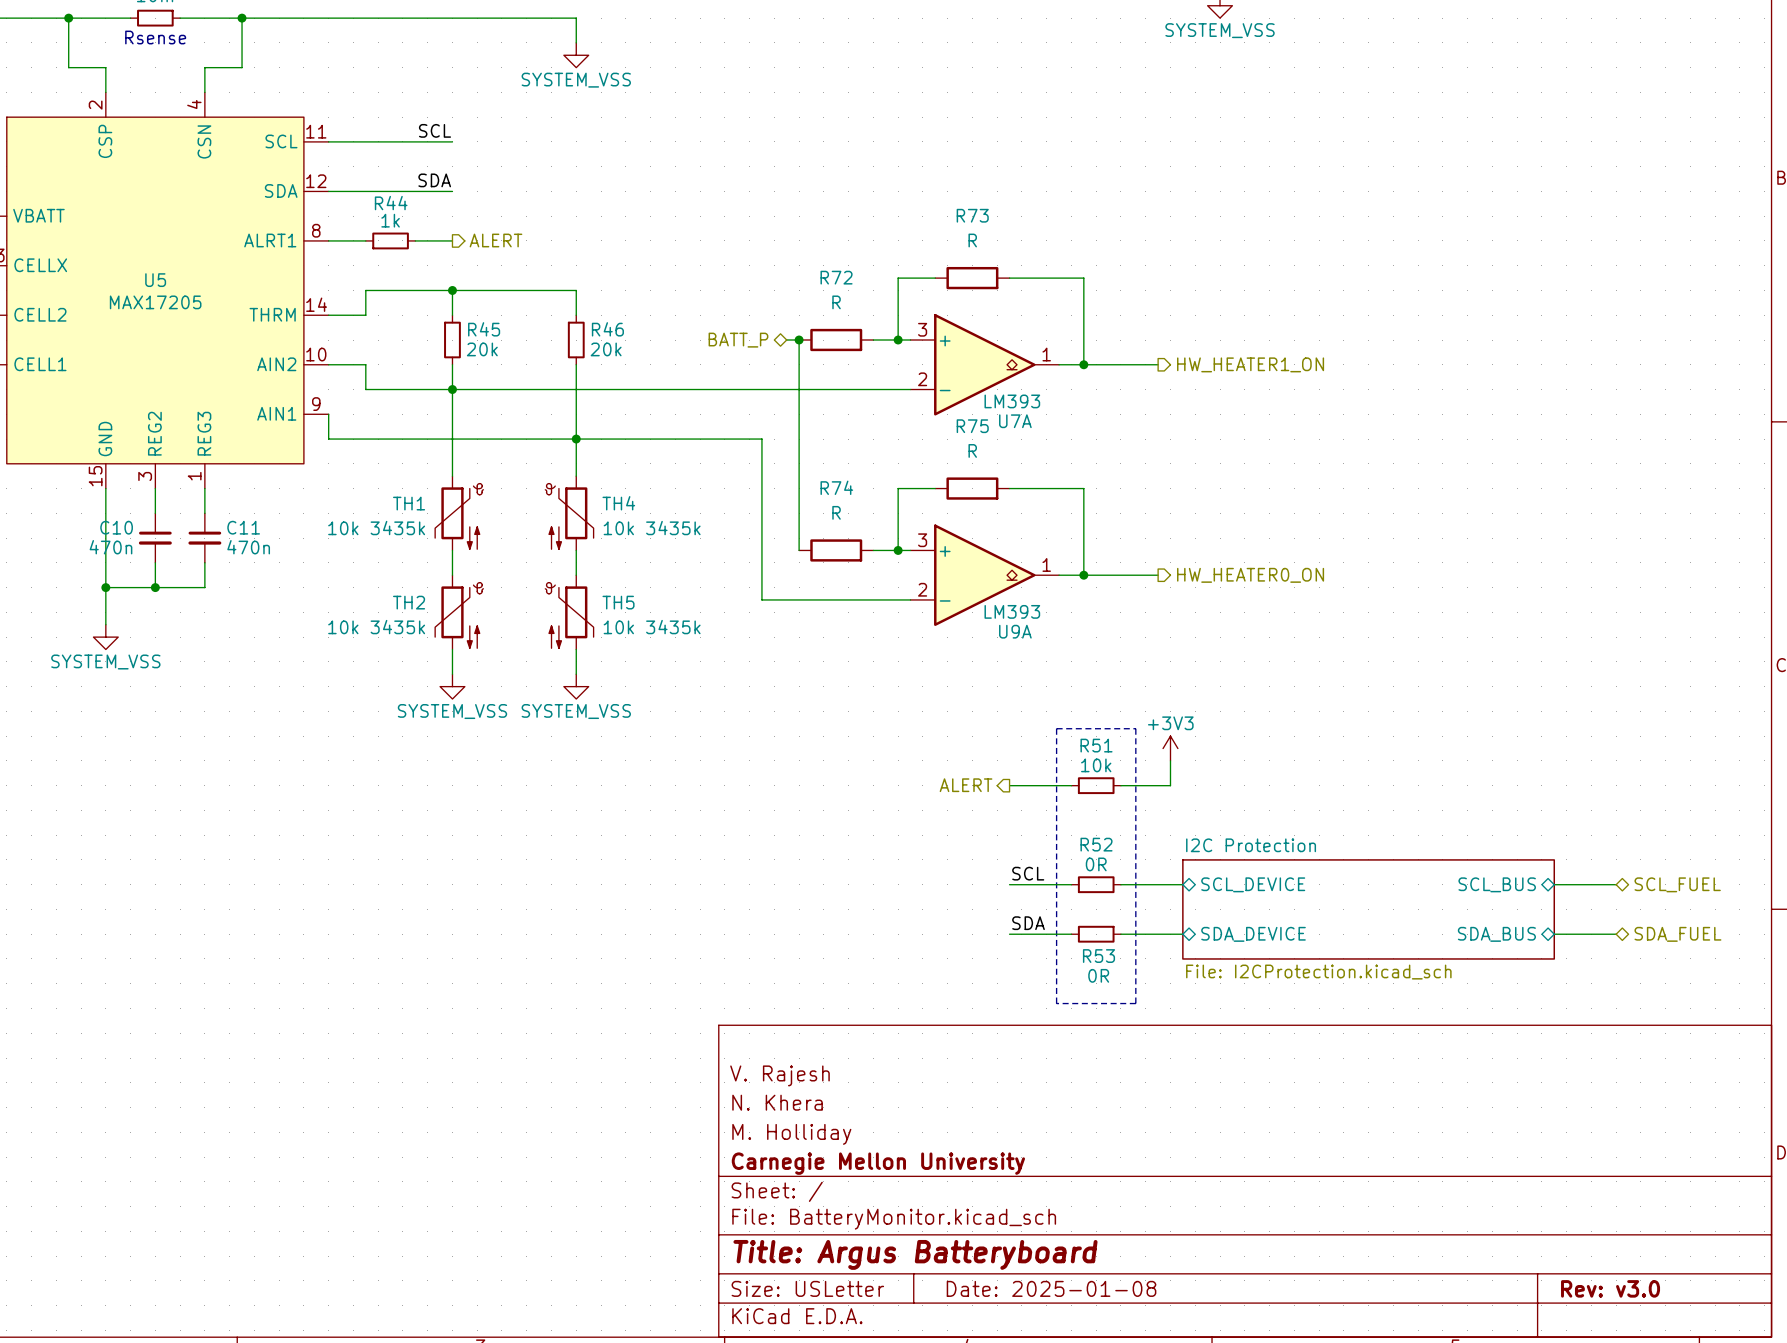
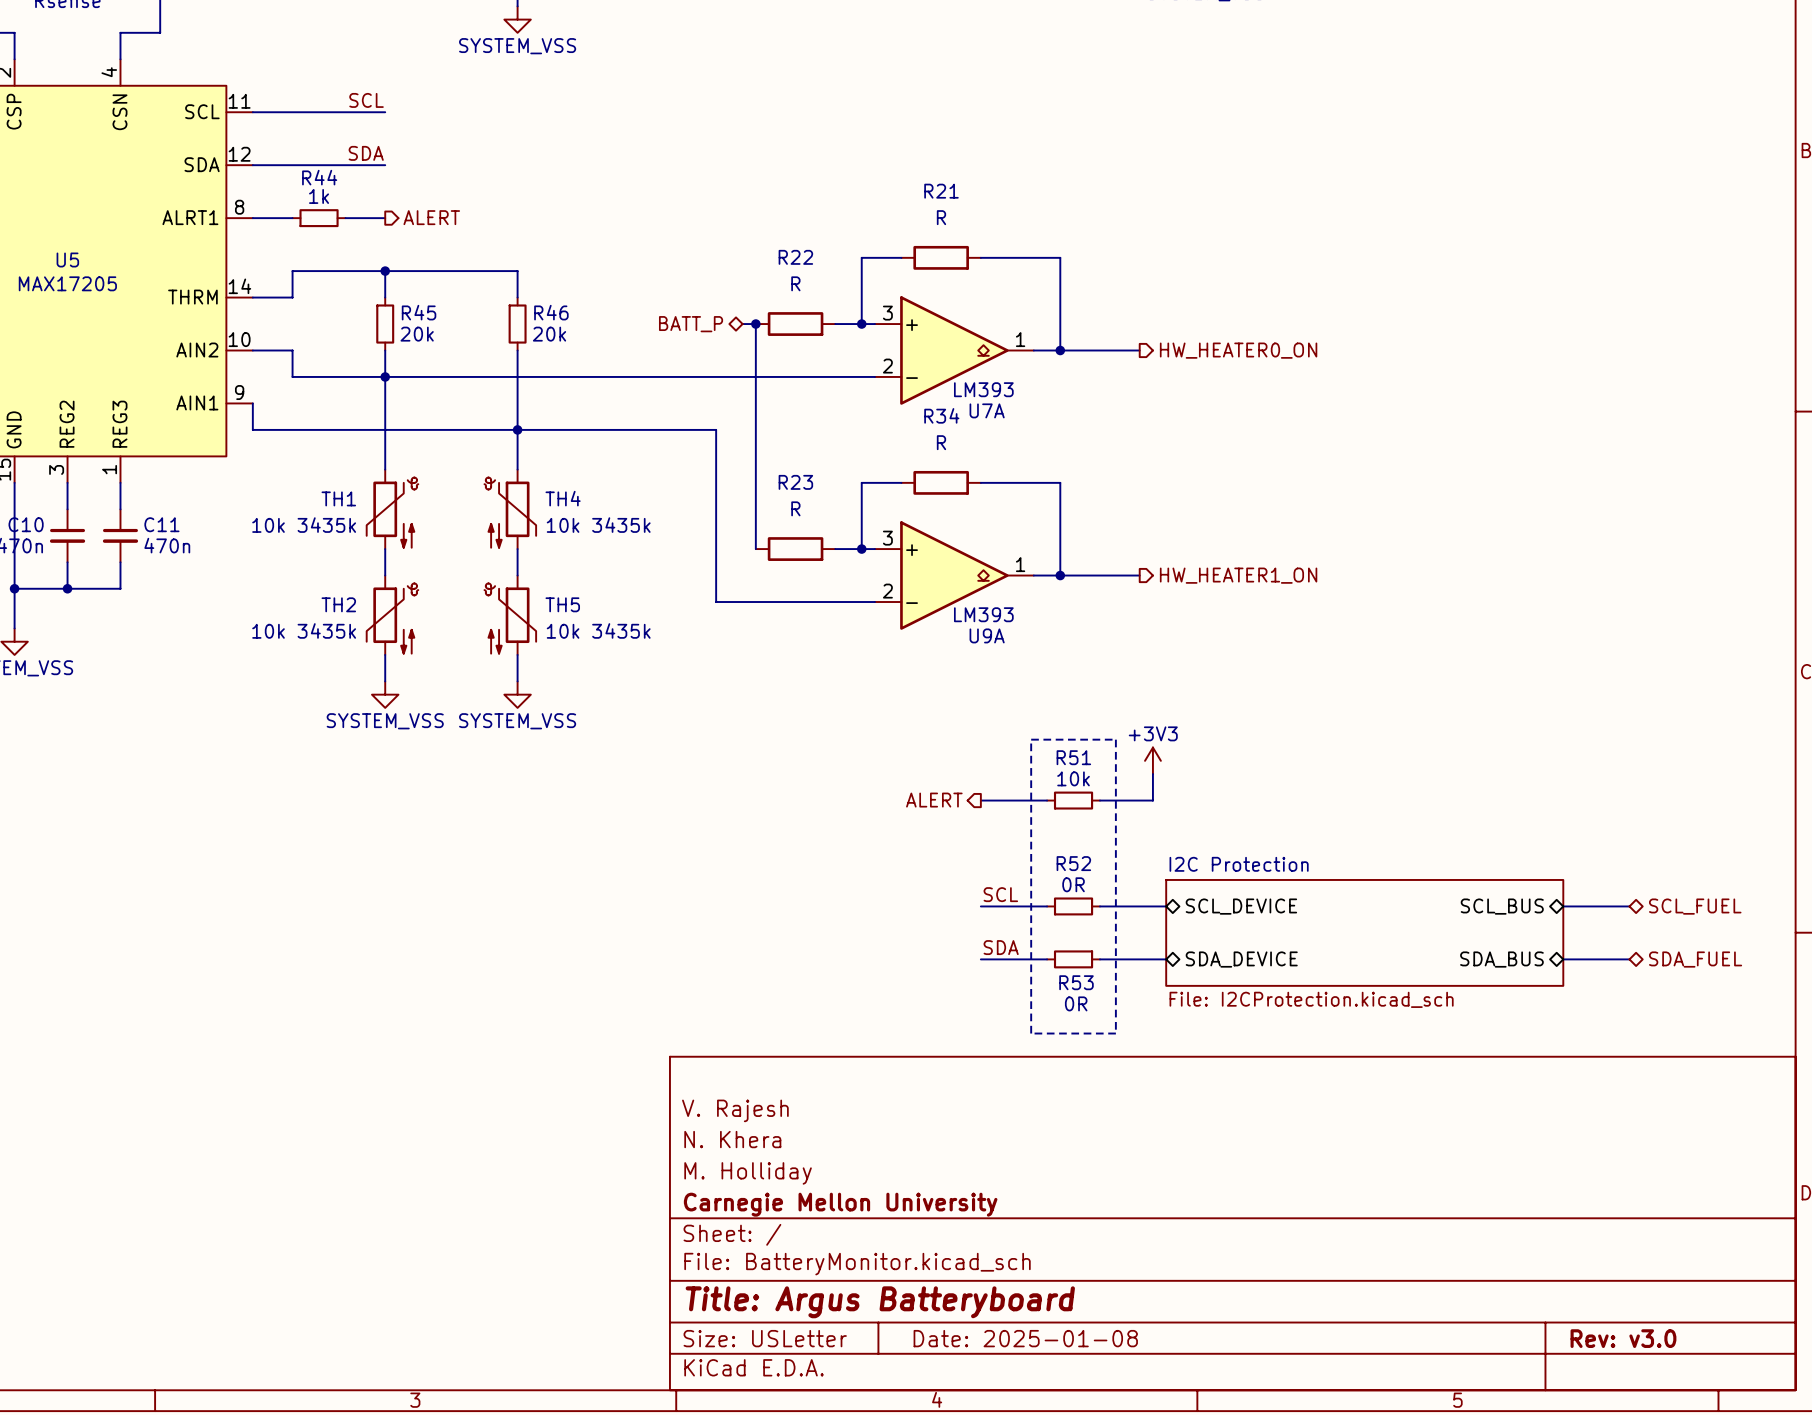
R73 name: R73 (972, 215) -> R21 (941, 191)
R72 name: R72 (836, 277) -> R22 (795, 257)
hierarchical label: HW_HEATER1_ON (1250, 364) -> HW_HEATER0_ON (1238, 350)
R75 name: R75 (972, 426) -> R34 (941, 415)
R74 name: R74 (836, 487) -> R23 (795, 482)
hierarchical label: HW_HEATER0_ON (1250, 575) -> HW_HEATER1_ON (1238, 575)

